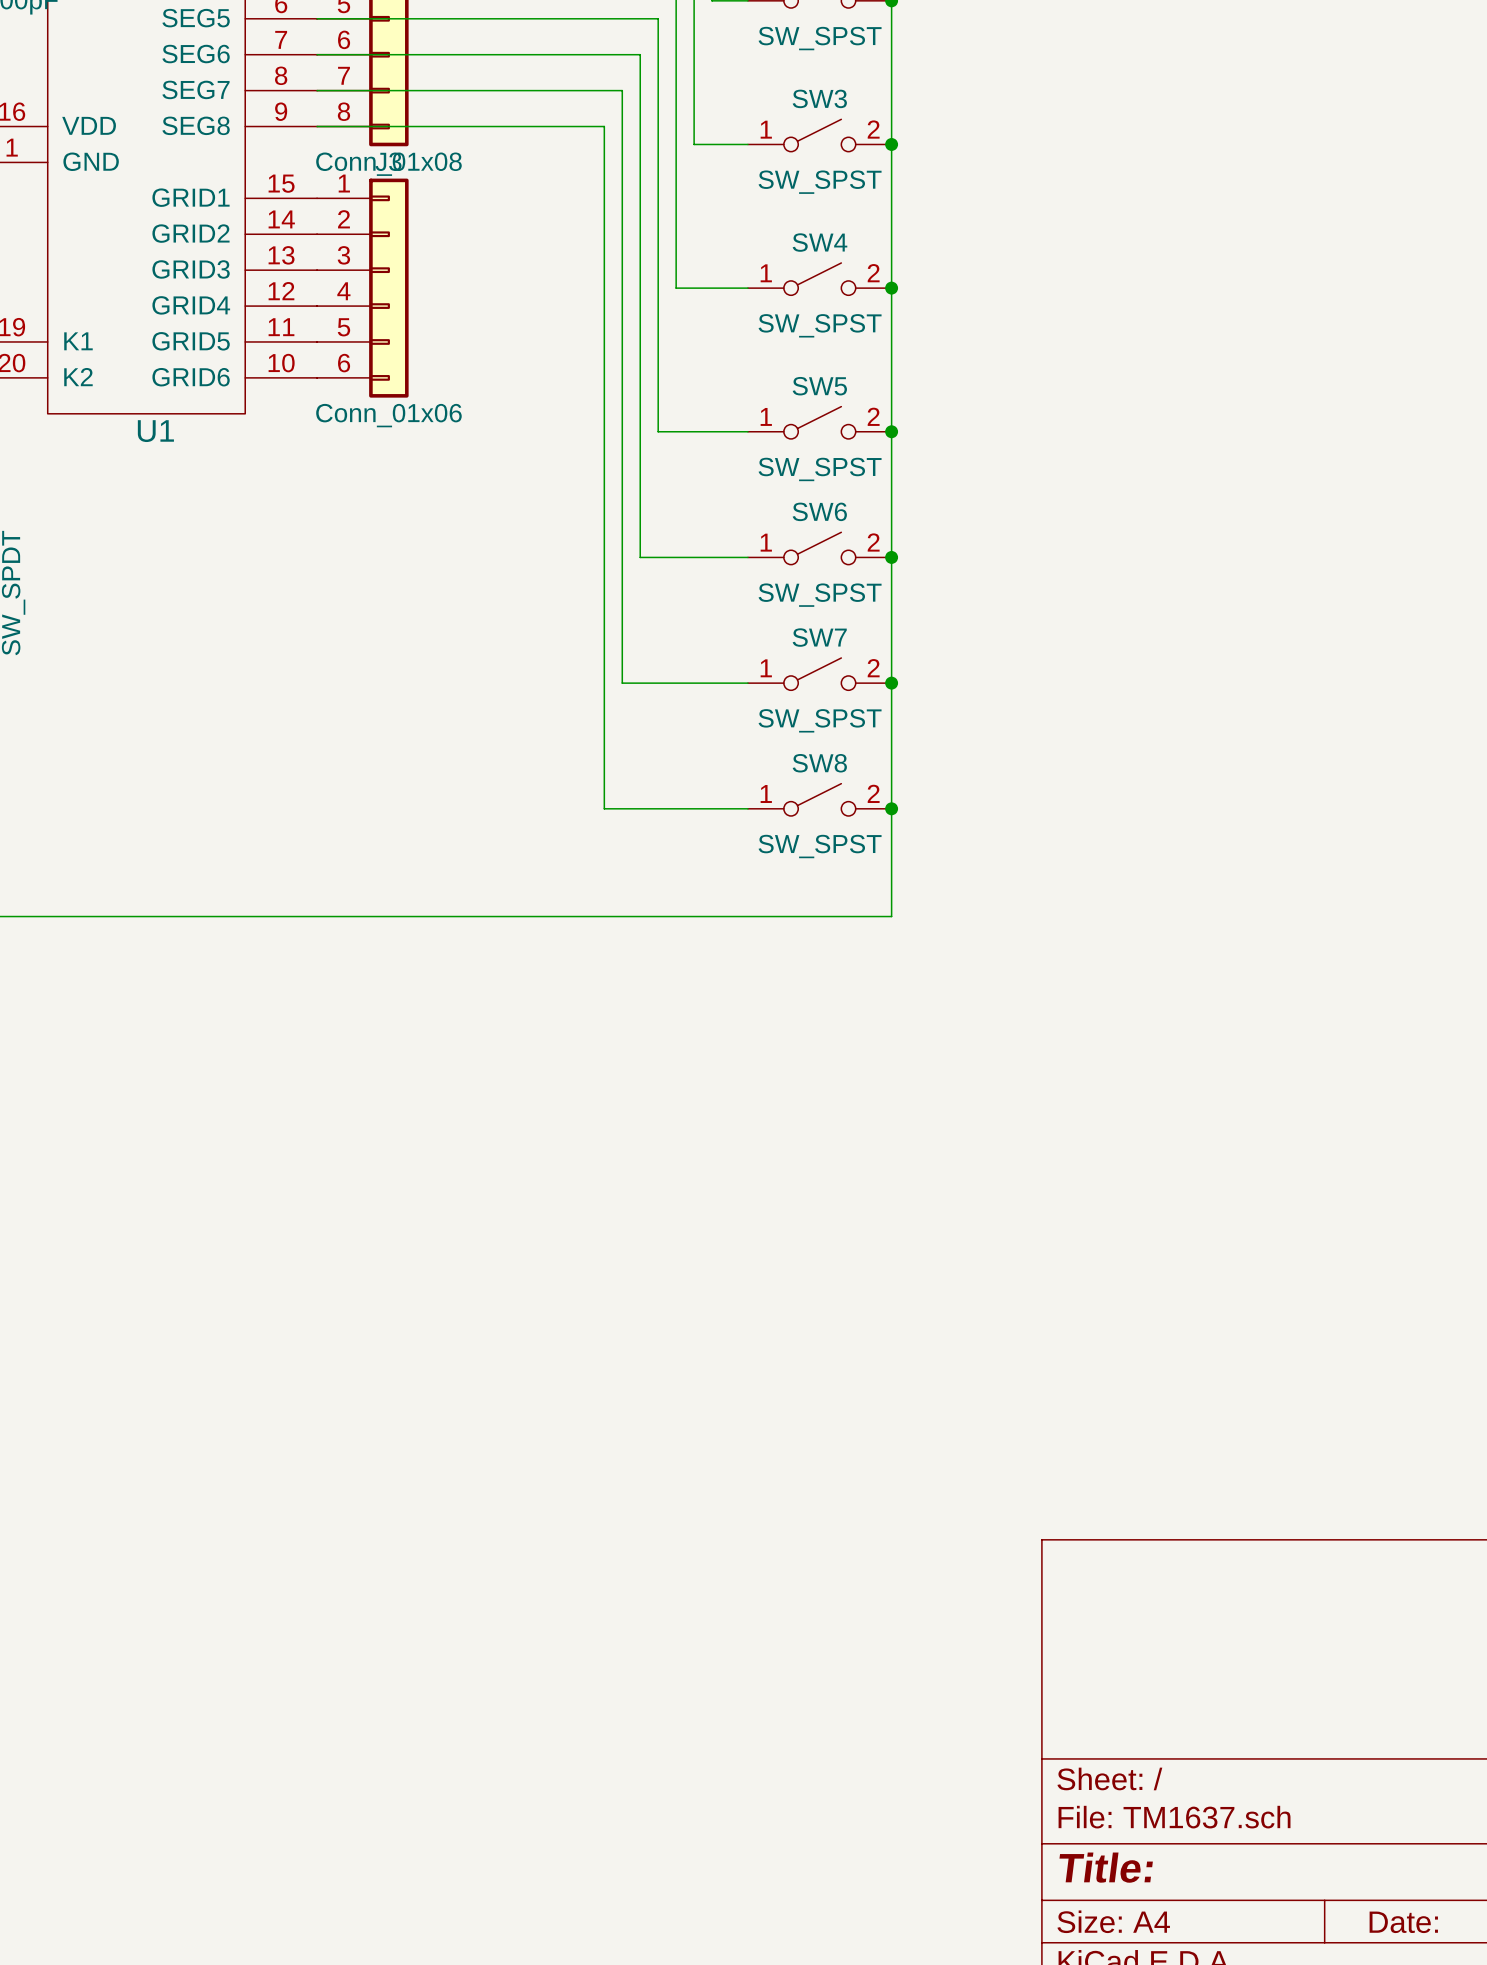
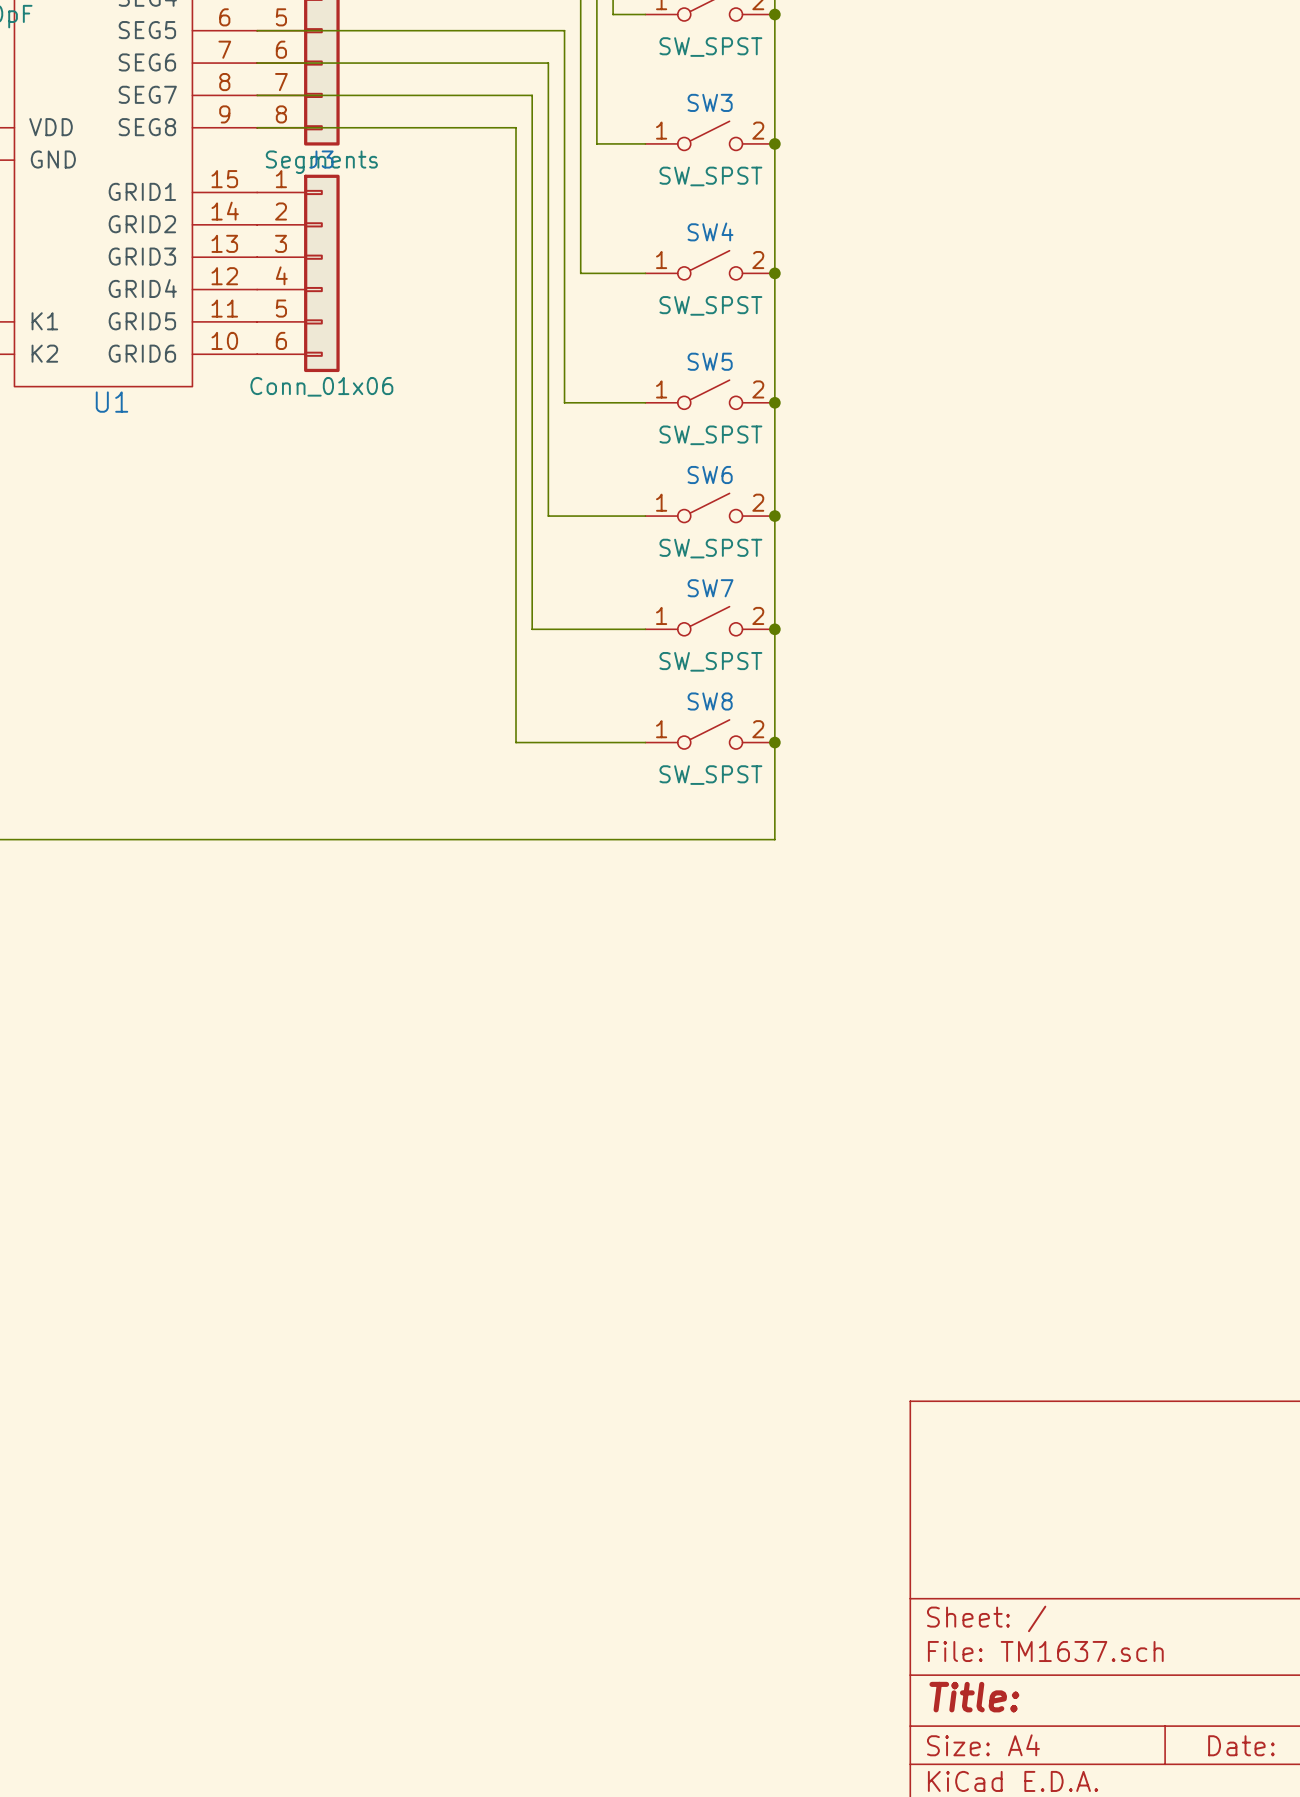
part value: Conn_01x08 (388, 164) -> Segments (321, 162)

